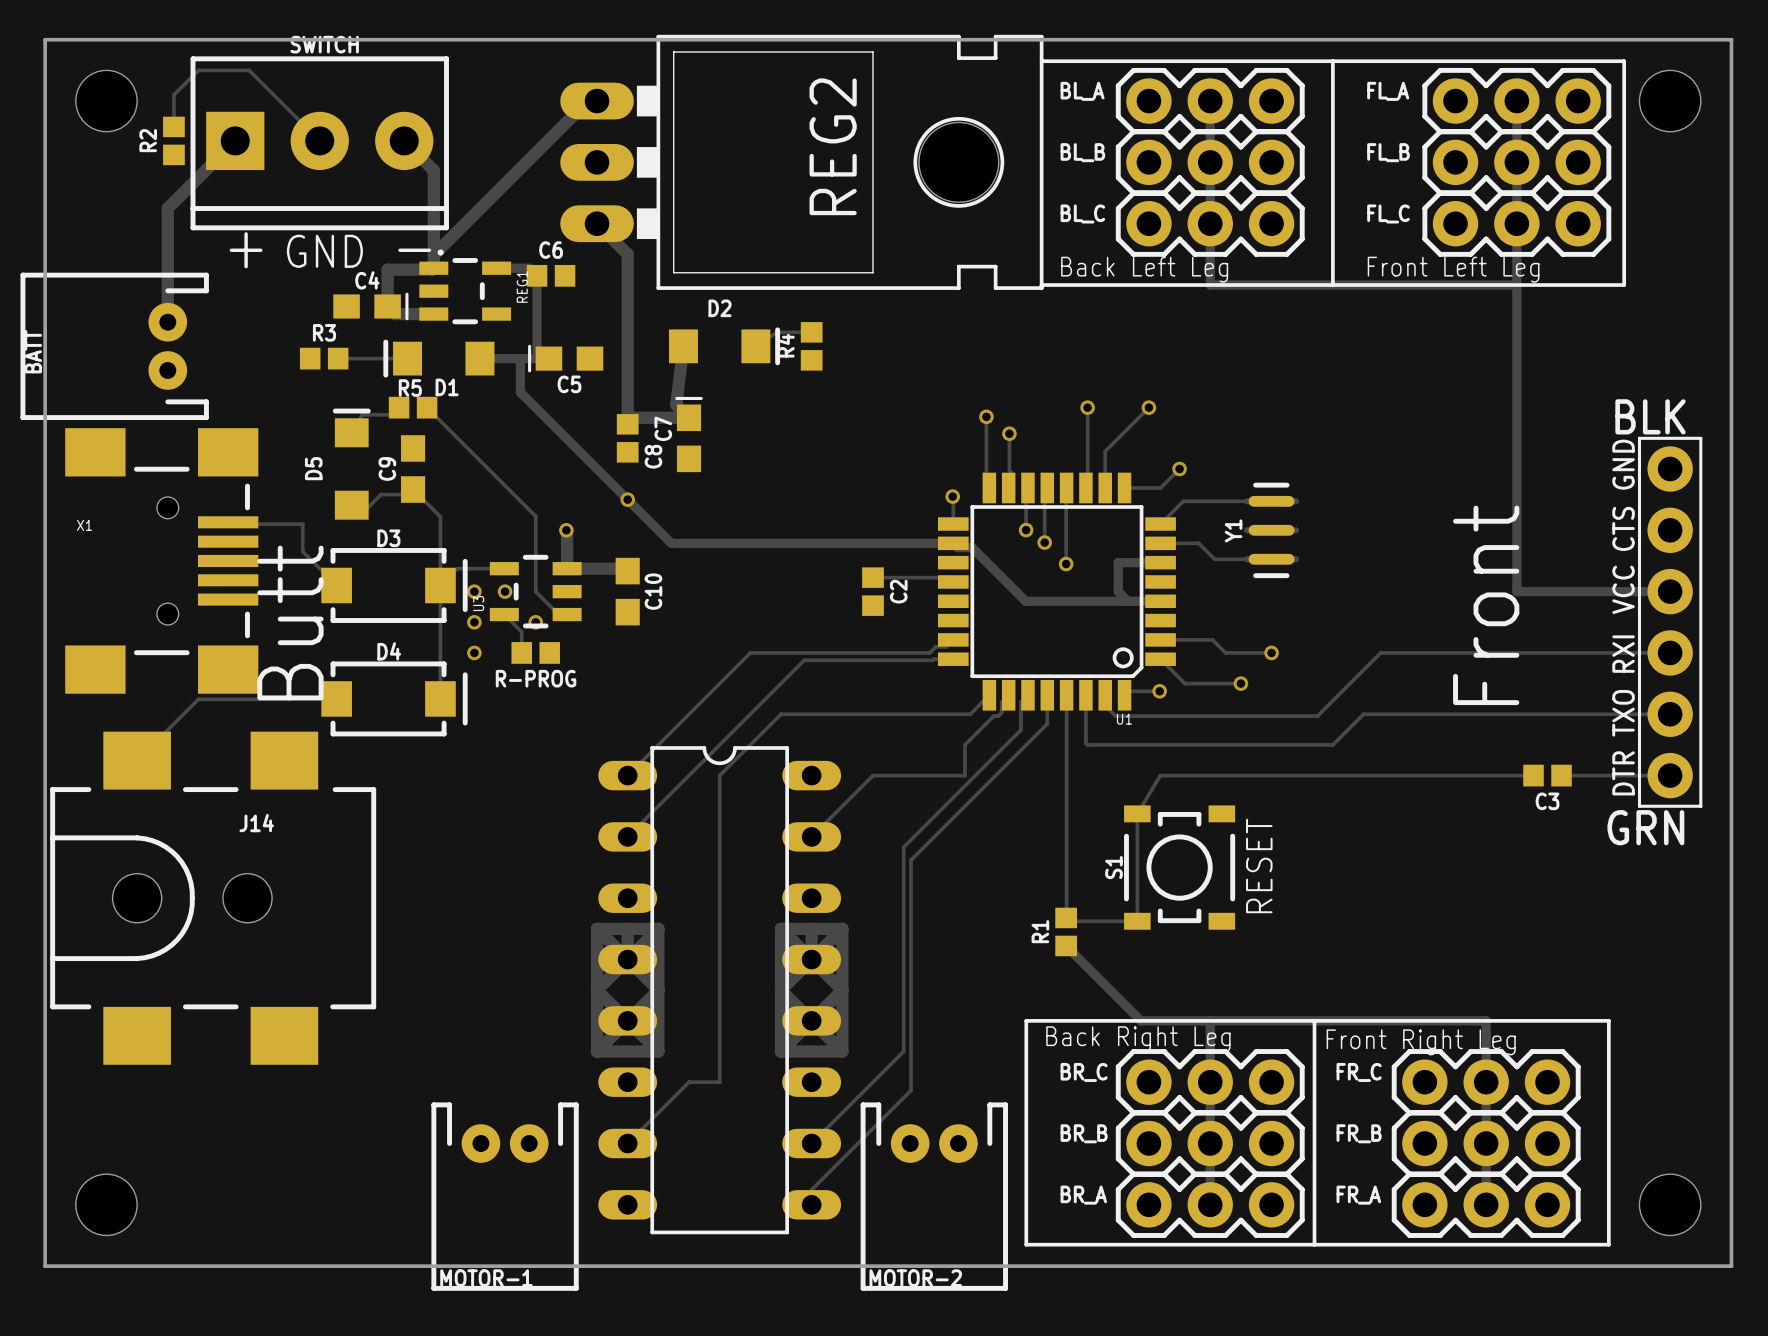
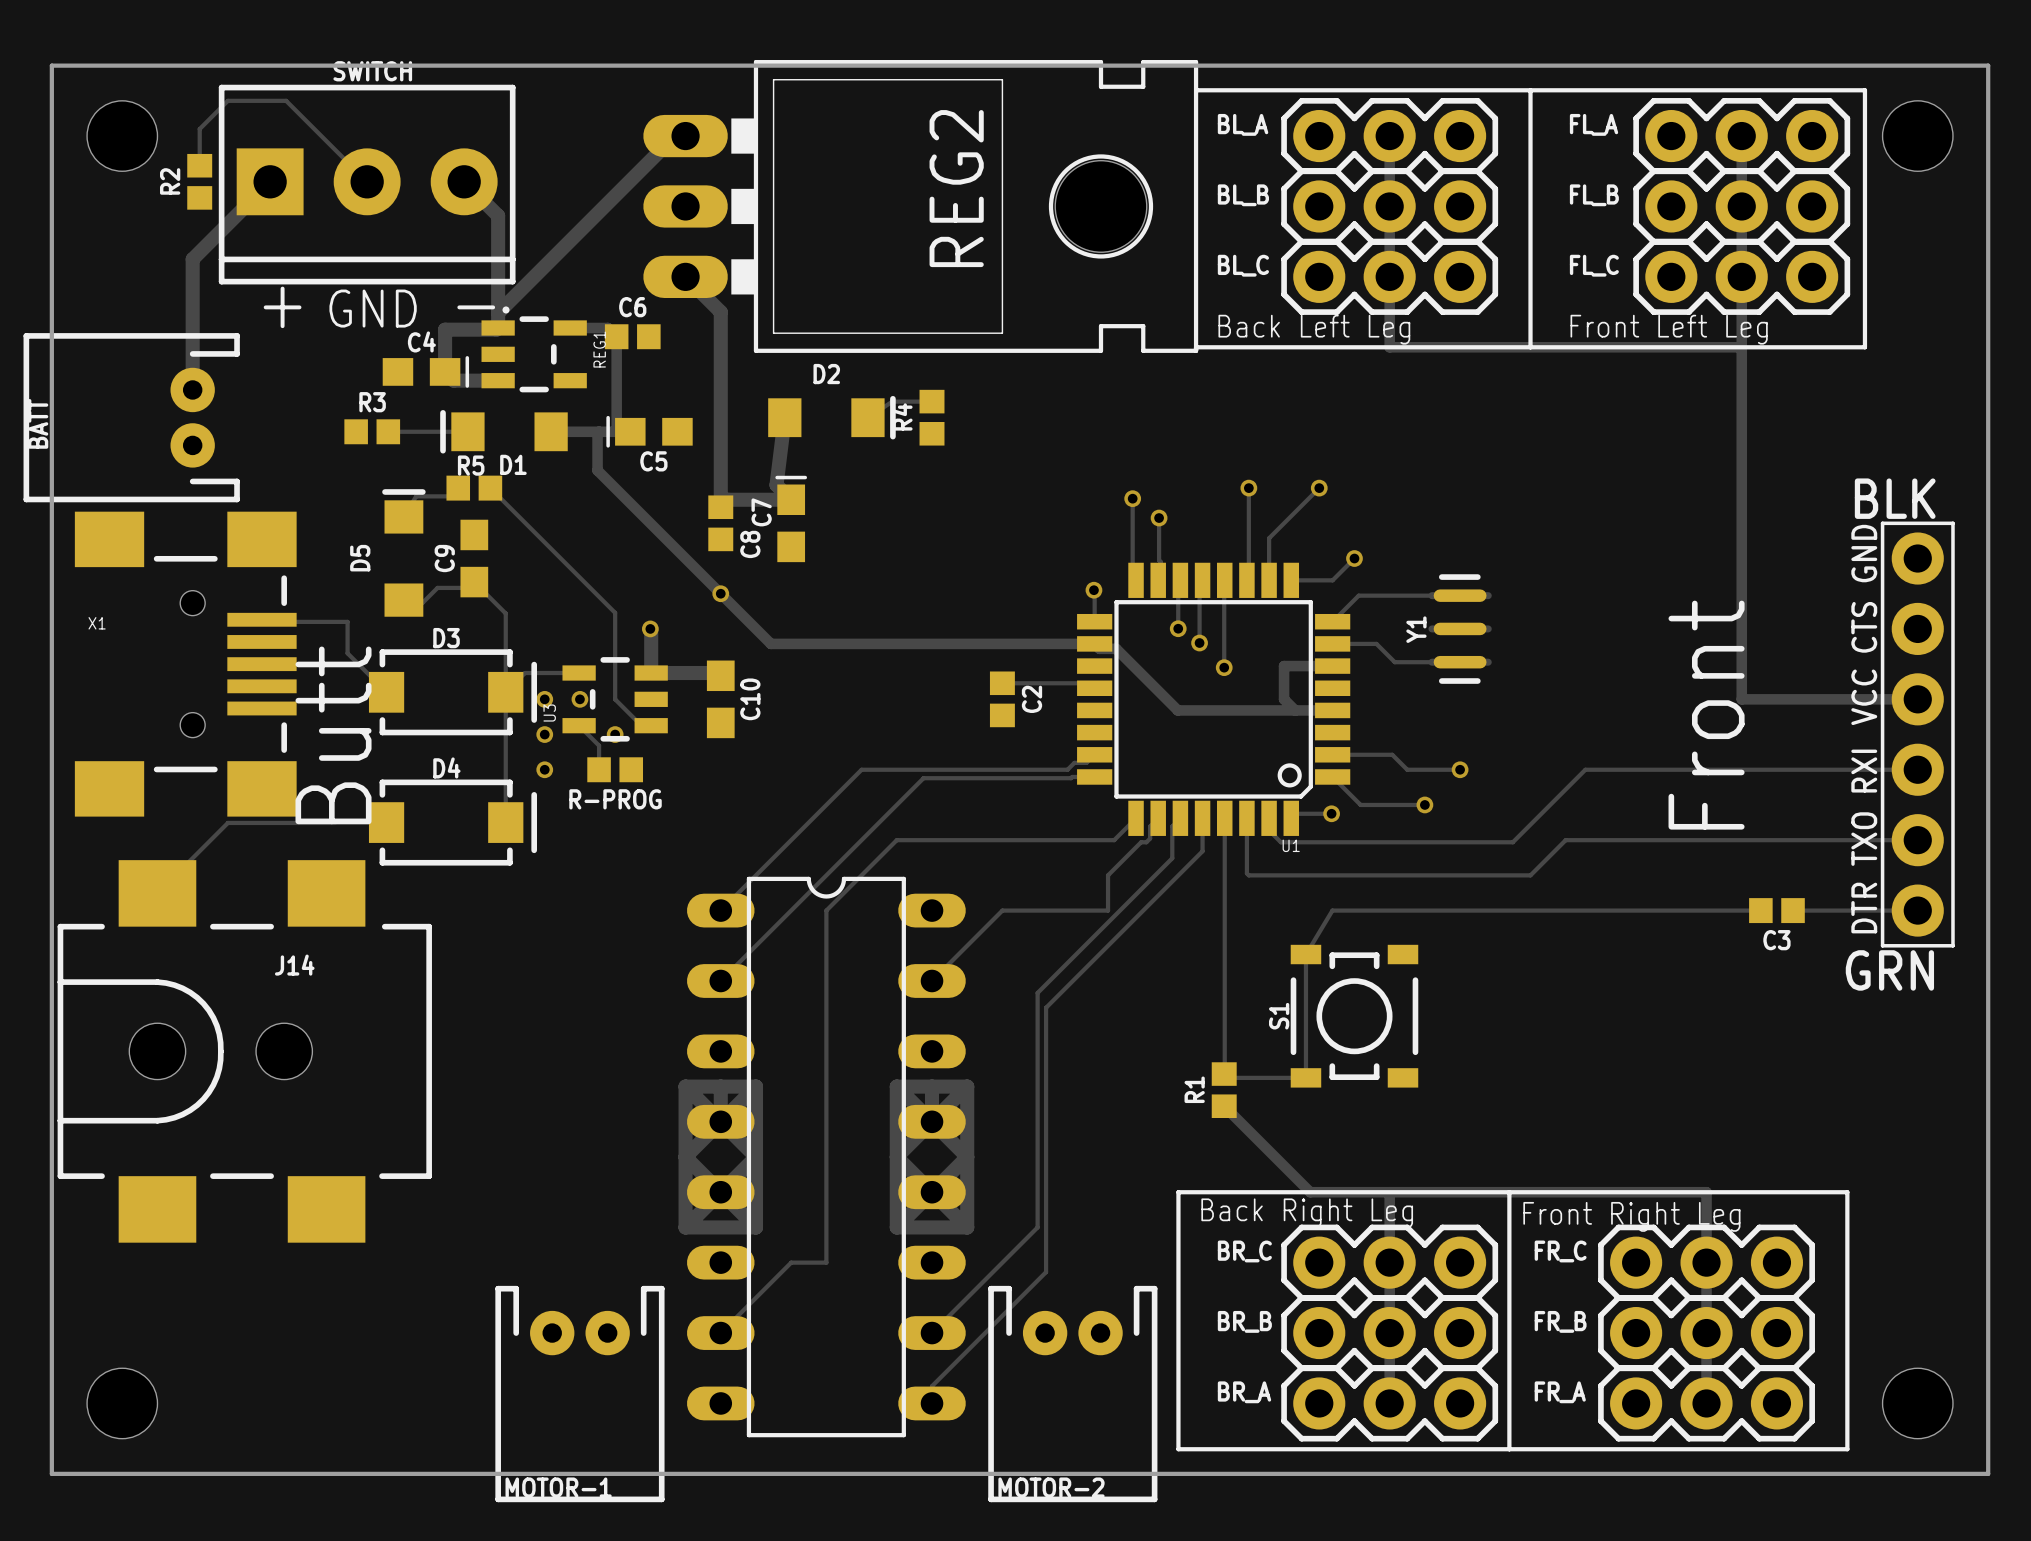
text: RESET (1259, 865) -> none

